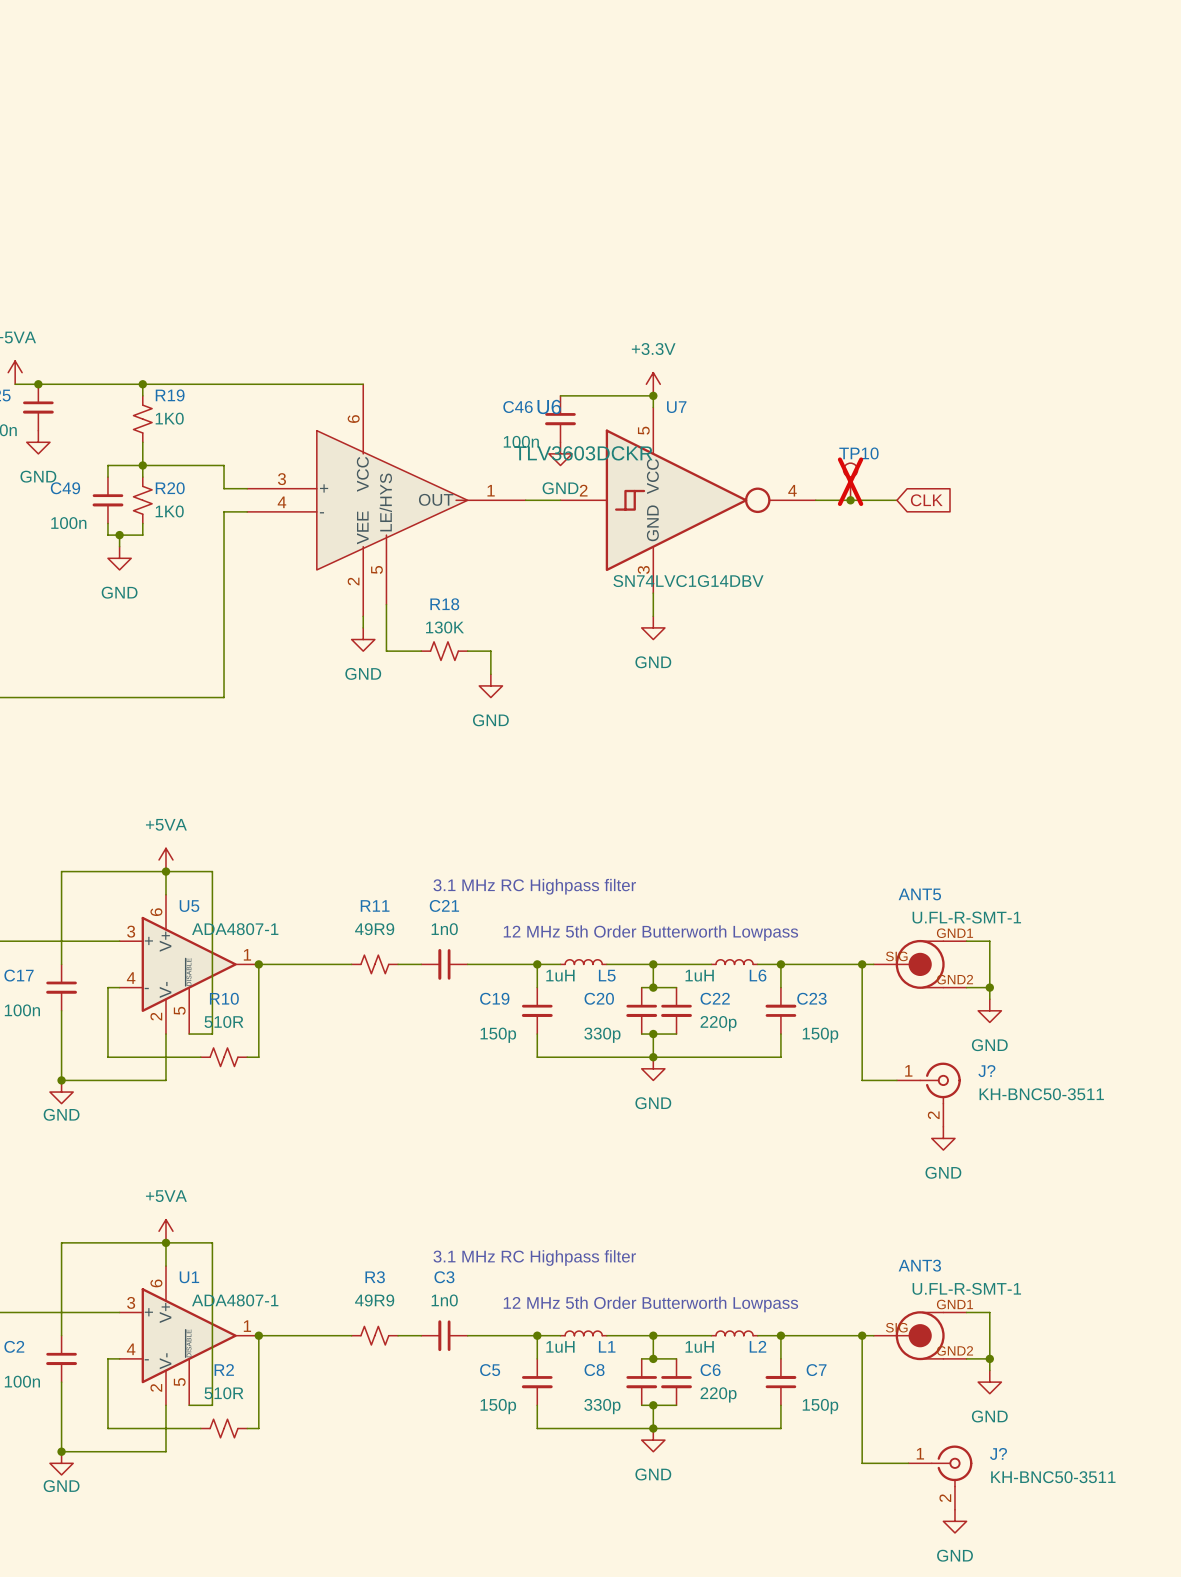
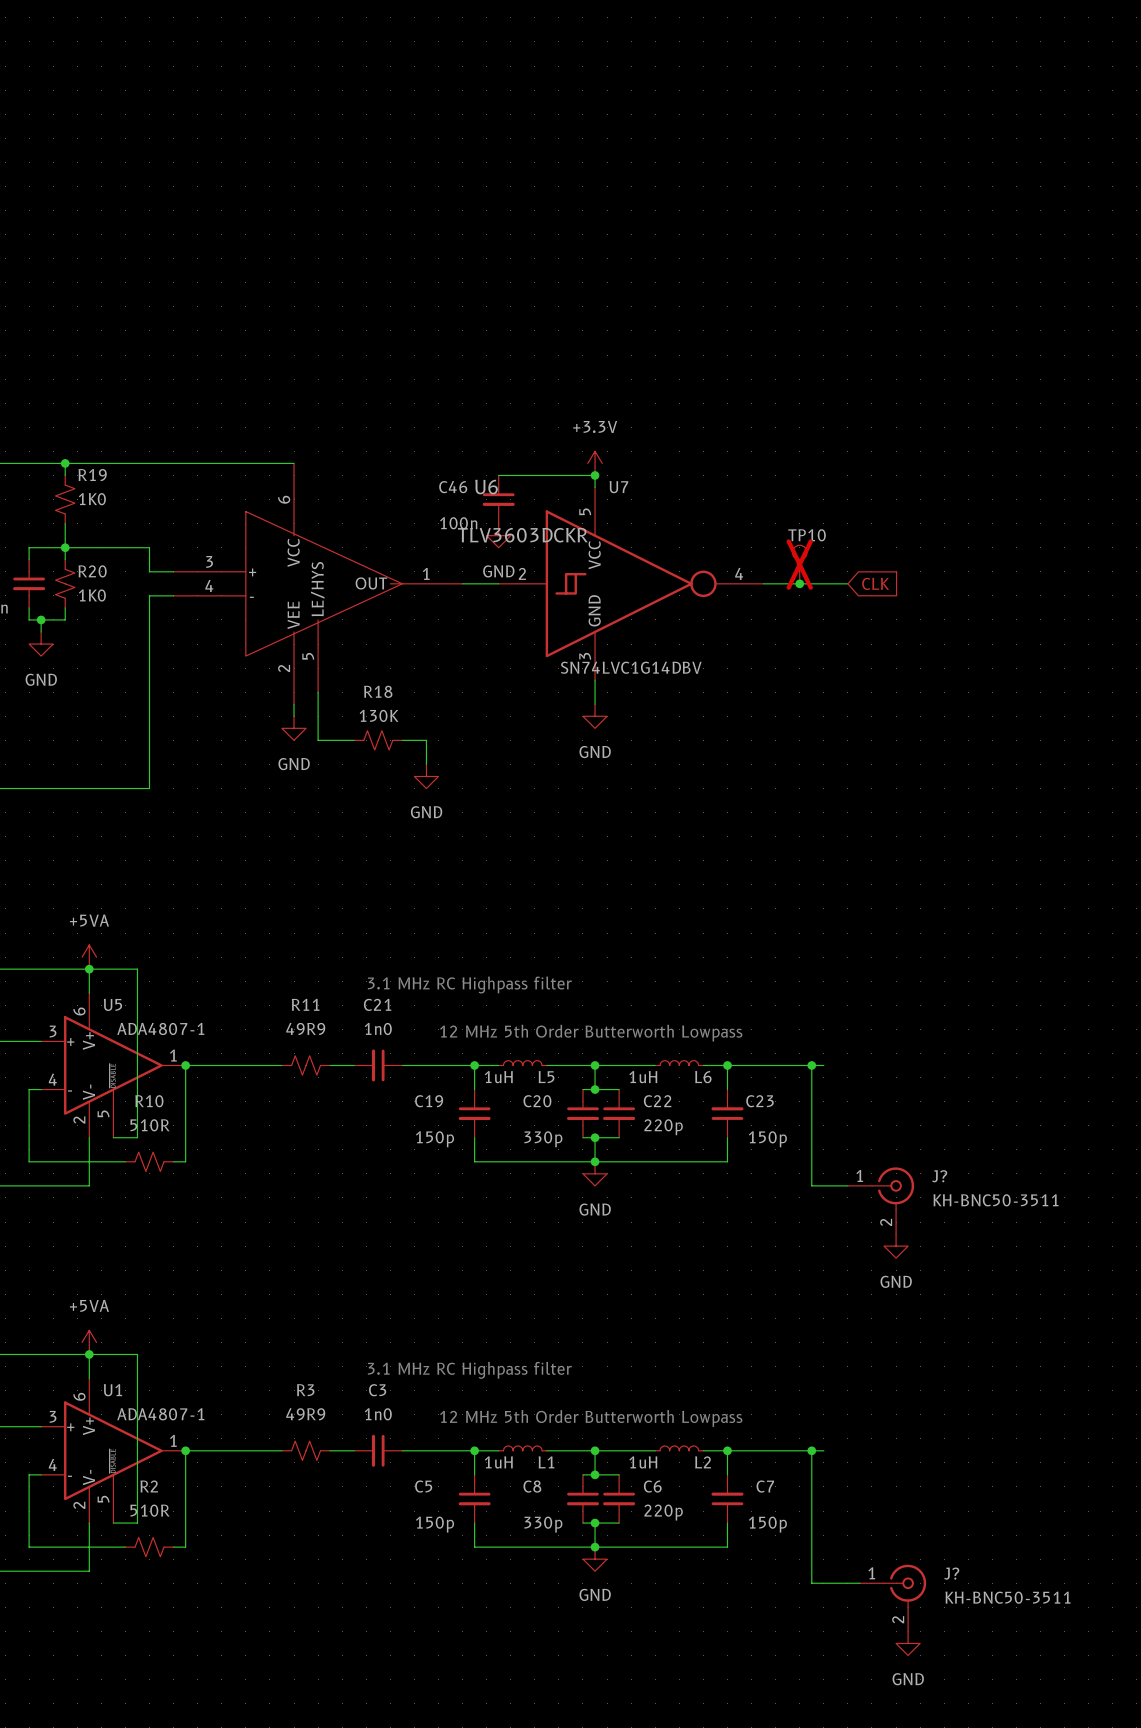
wire: (966, 941) (989, 941) (989, 999) -> none
ANT5: U.FL-R-SMT-1 (920, 964) -> none
wire: (966, 987) (989, 987) -> none
junction: (989, 987) -> none
power symbol: GND (989, 1010) -> none
wire: (966, 1312) (989, 1312) (989, 1370) -> none
ANT3: U.FL-R-SMT-1 (920, 1335) -> none
wire: (966, 1358) (989, 1358) -> none
junction: (989, 1358) -> none
power symbol: GND (989, 1382) -> none

